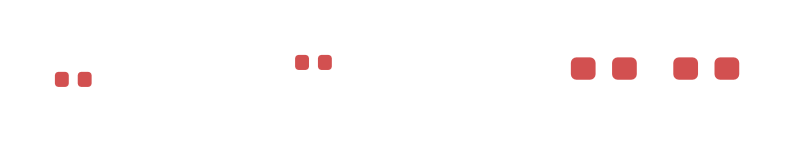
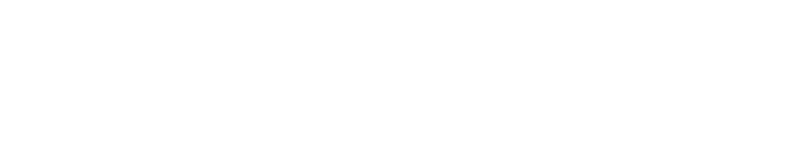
part: (313, 62) -> none
part: (603, 68) -> none
part: (706, 68) -> none
part: (73, 79) -> none

